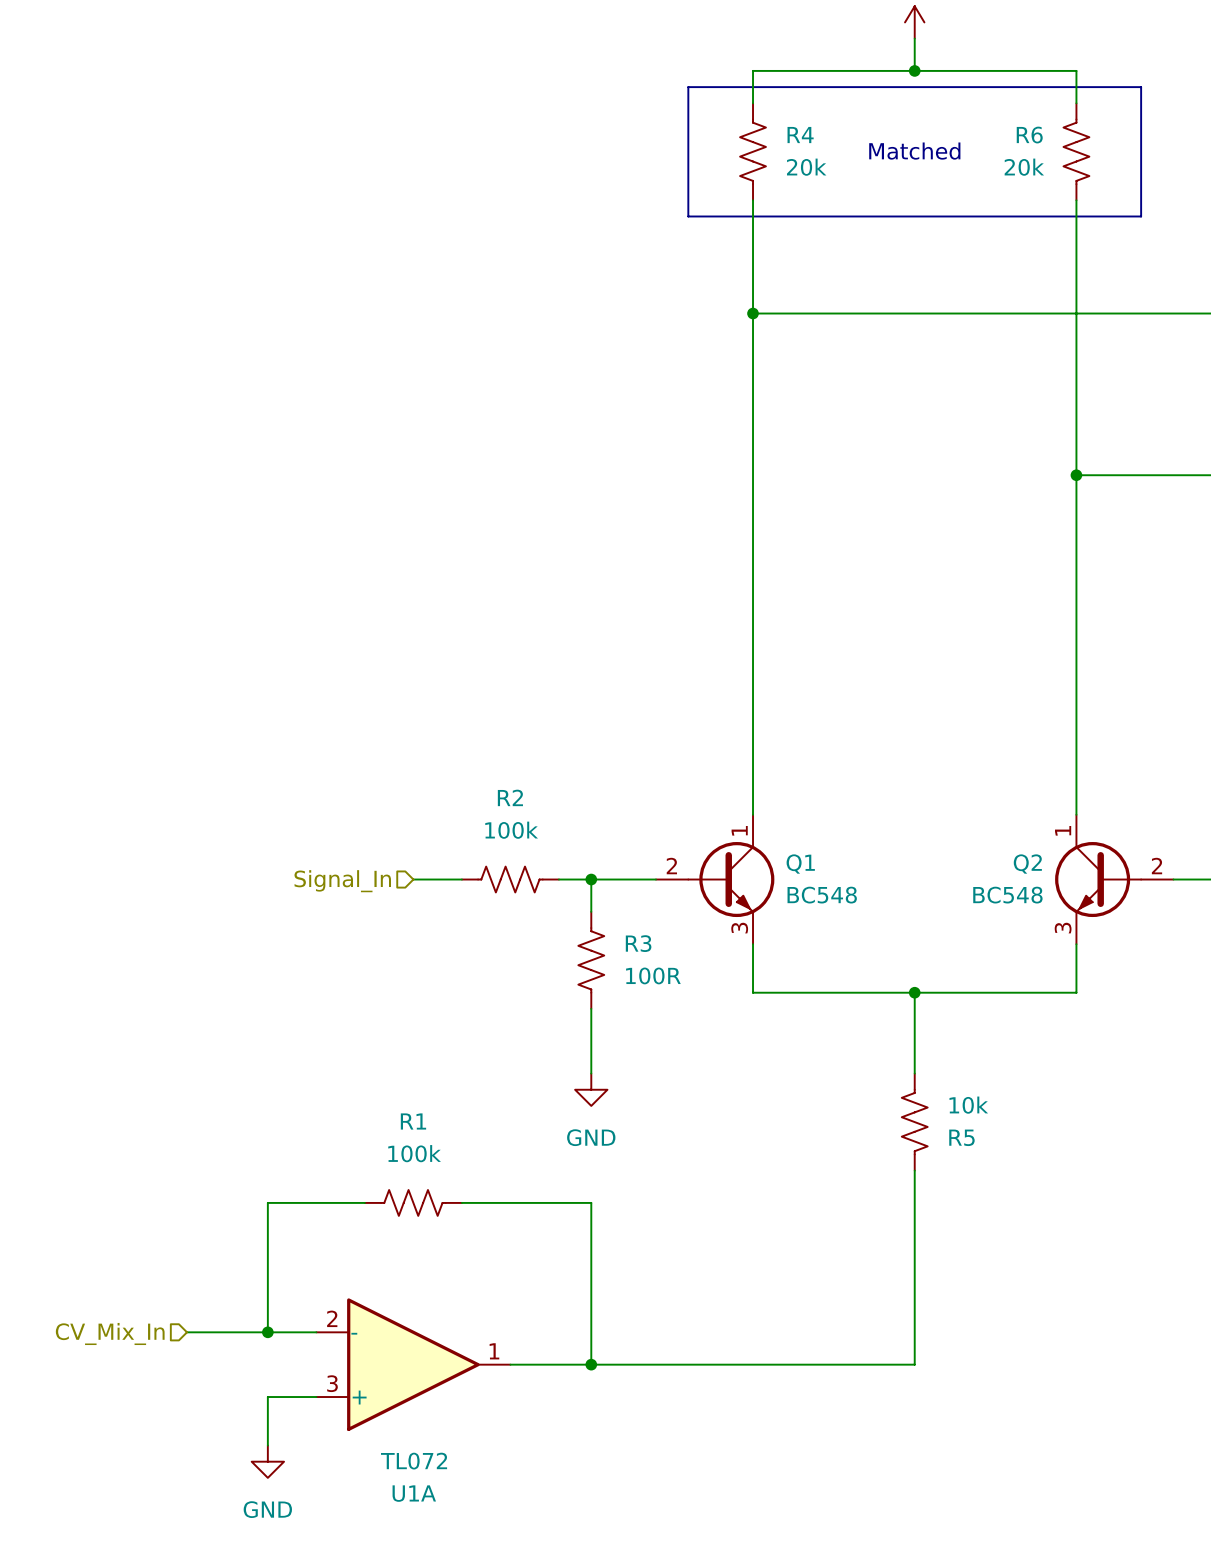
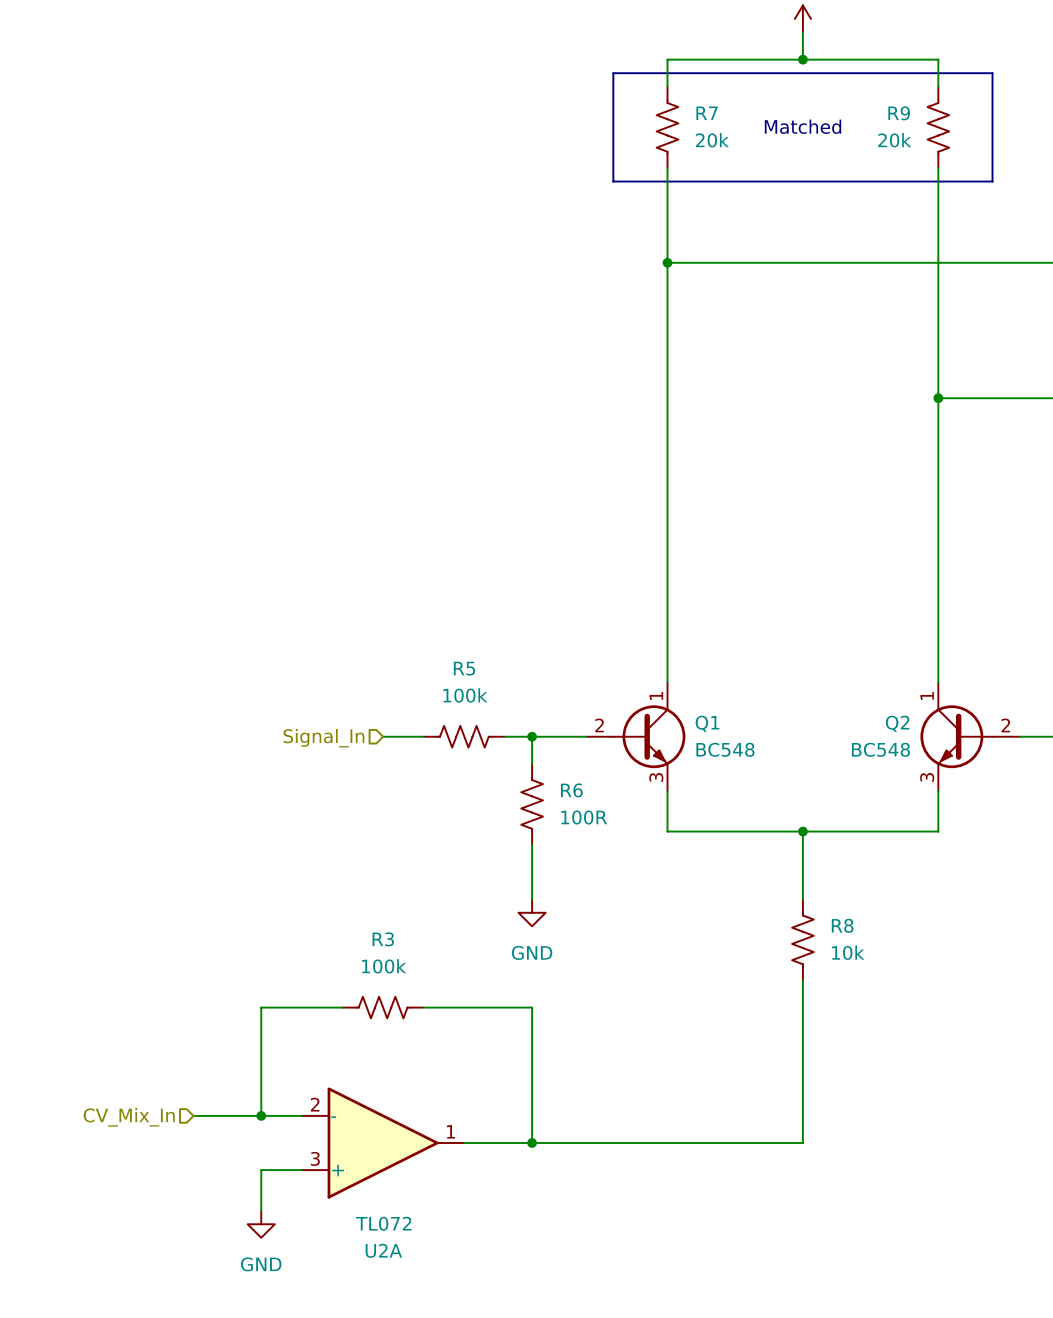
R4 name: R4 (800, 135) -> R7 (707, 113)
R6 name: R6 (1029, 135) -> R9 (899, 113)
R2 name: R2 (510, 797) -> R5 (464, 668)
R3 name: R3 (638, 943) -> R6 (571, 790)
R1 name: R1 (413, 1121) -> R3 (383, 939)
R5: 10k (914, 1122) -> none
R8: none -> 10k (802, 939)
U1A name: U1A (414, 1493) -> U2A (383, 1250)

